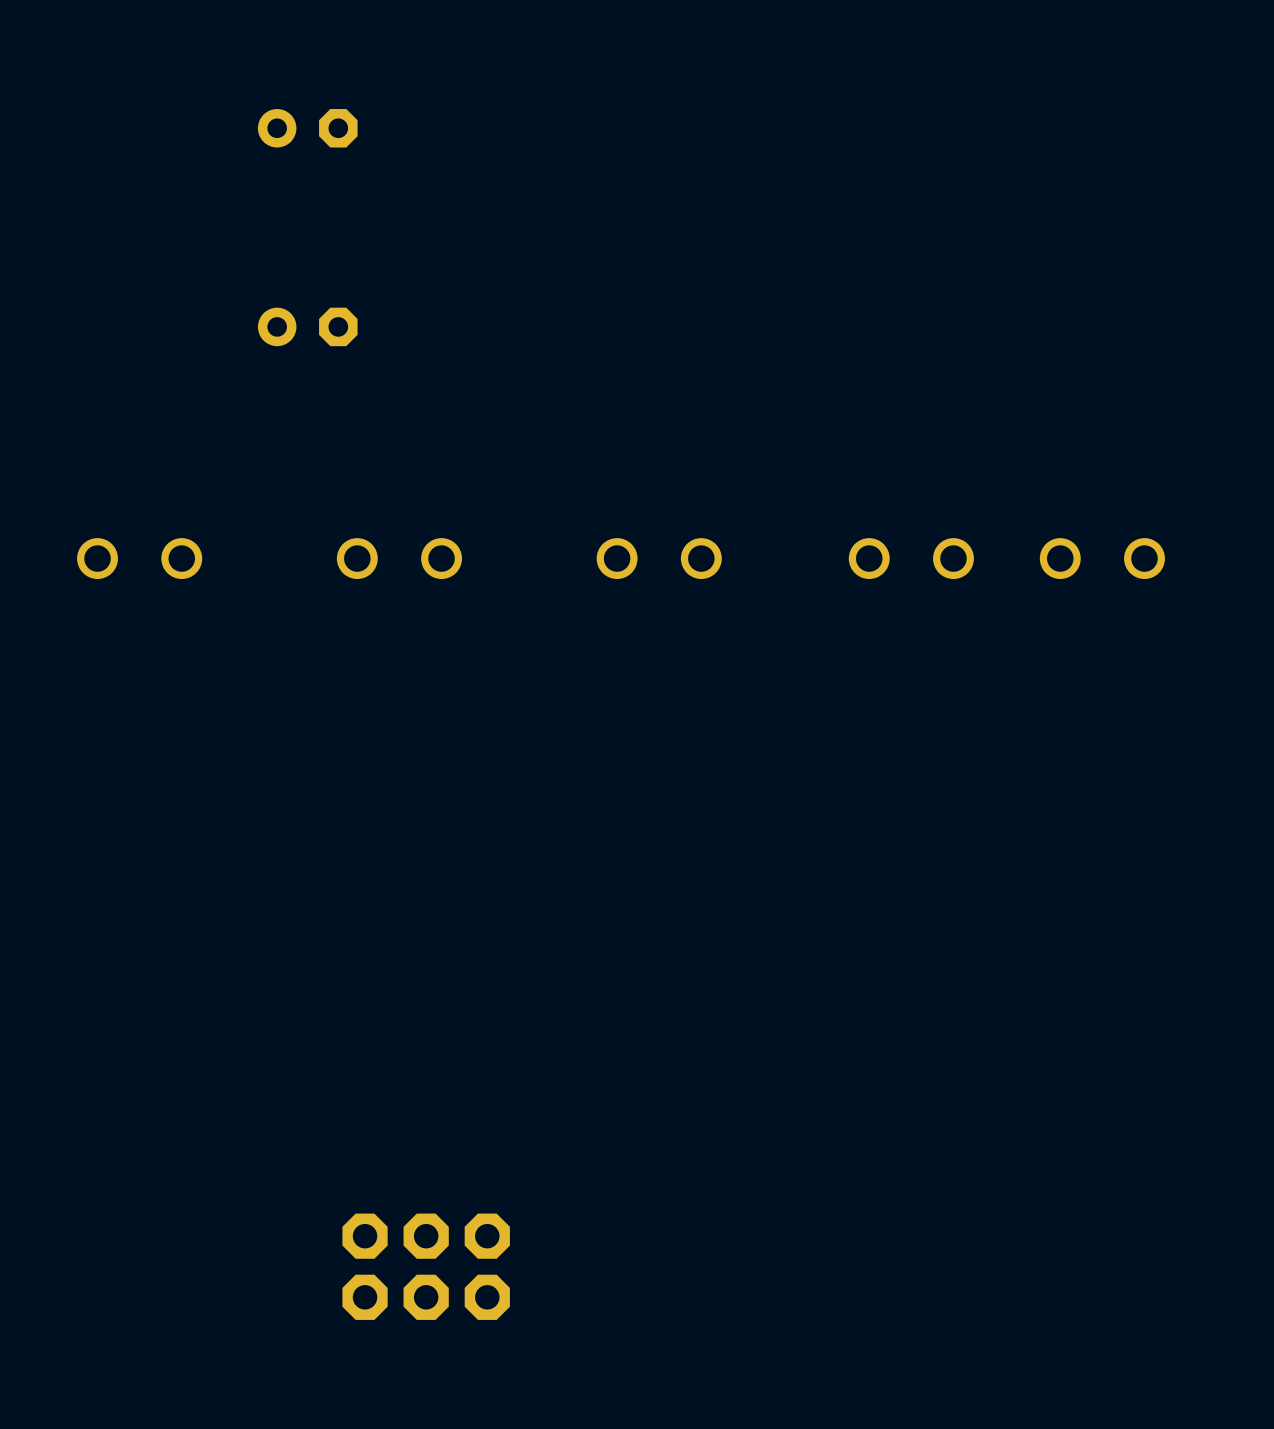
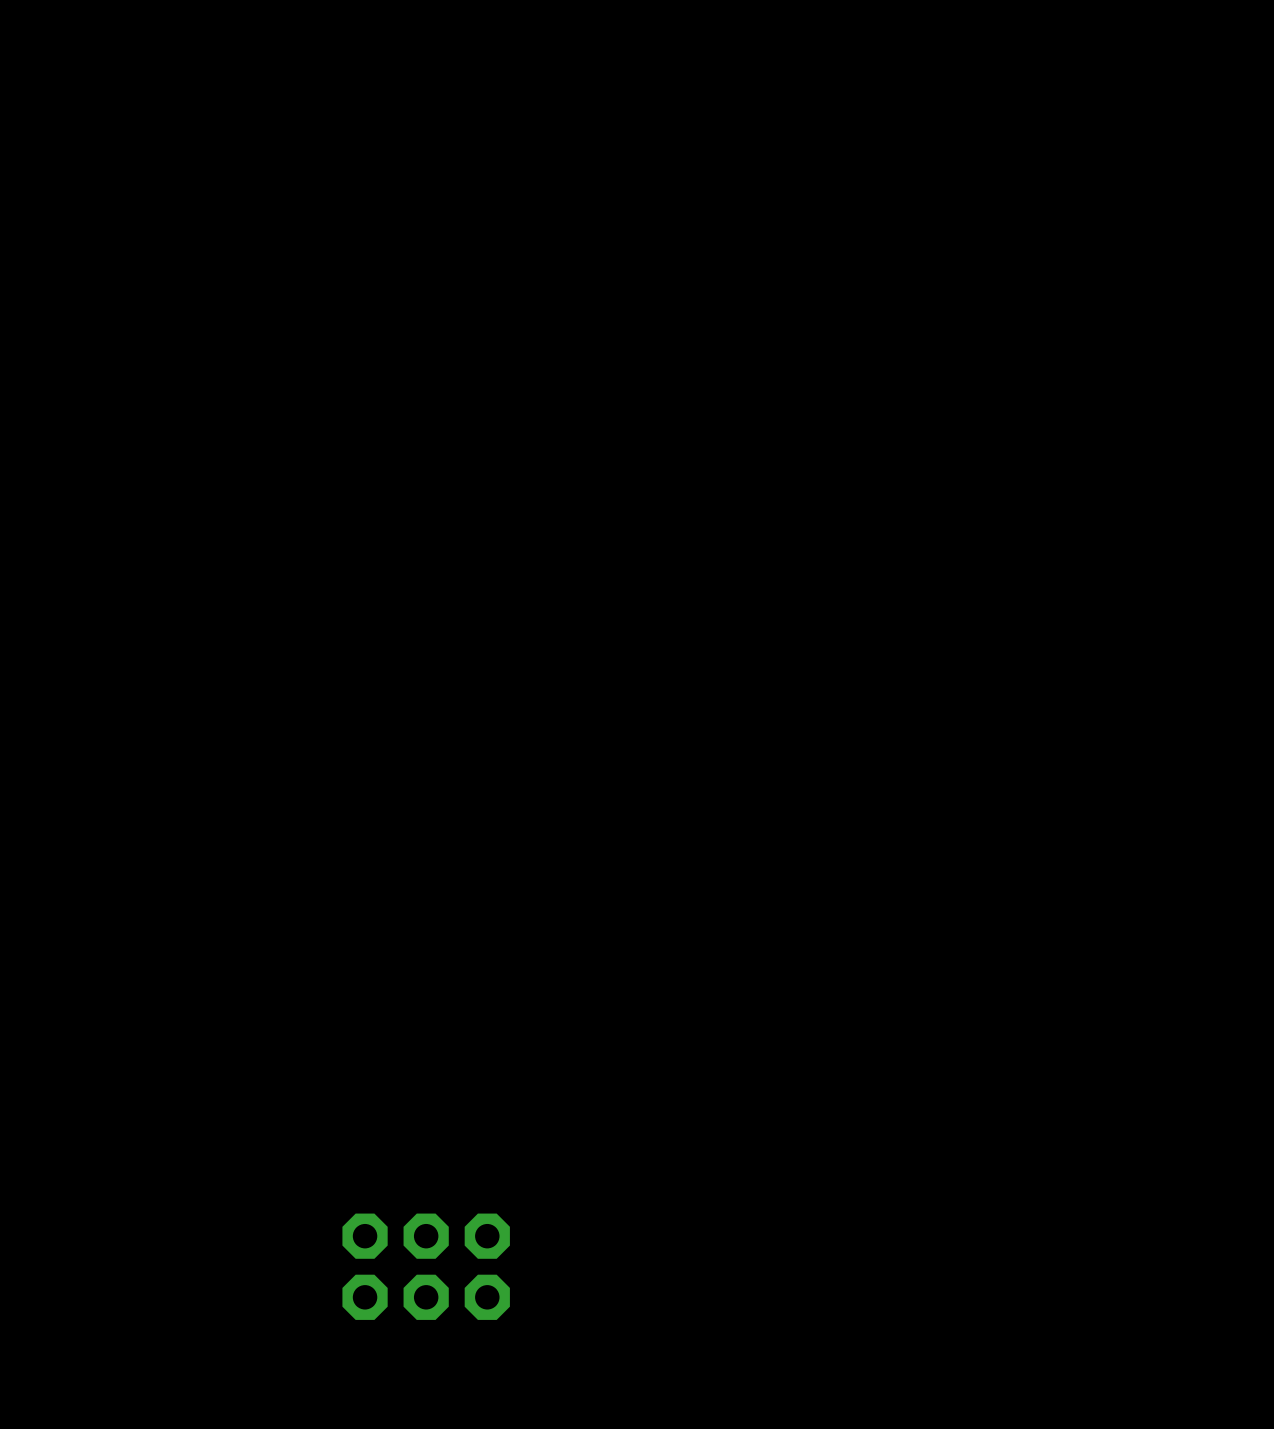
part: (307, 128) -> none
part: (307, 326) -> none
part: (139, 558) -> none
part: (399, 558) -> none
part: (659, 558) -> none
part: (911, 558) -> none
part: (1102, 558) -> none

